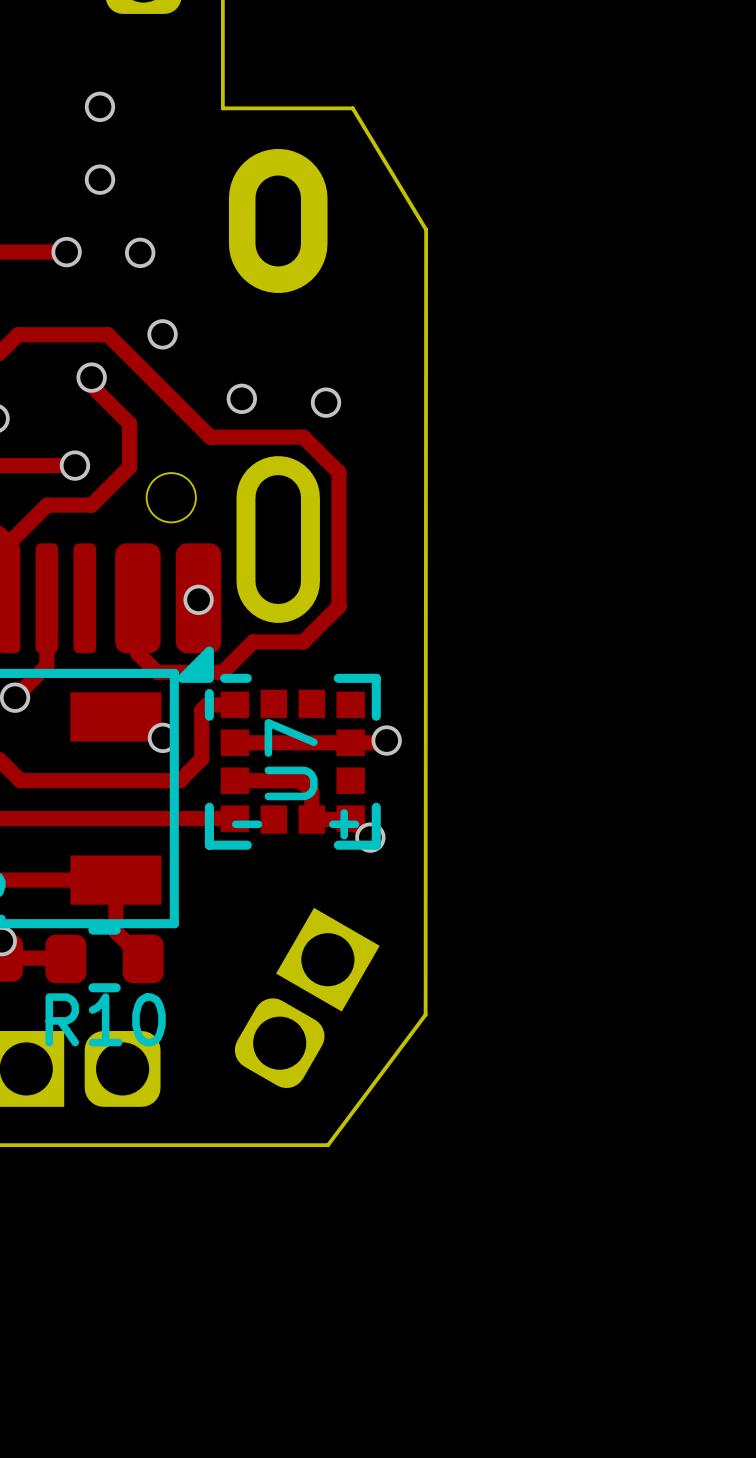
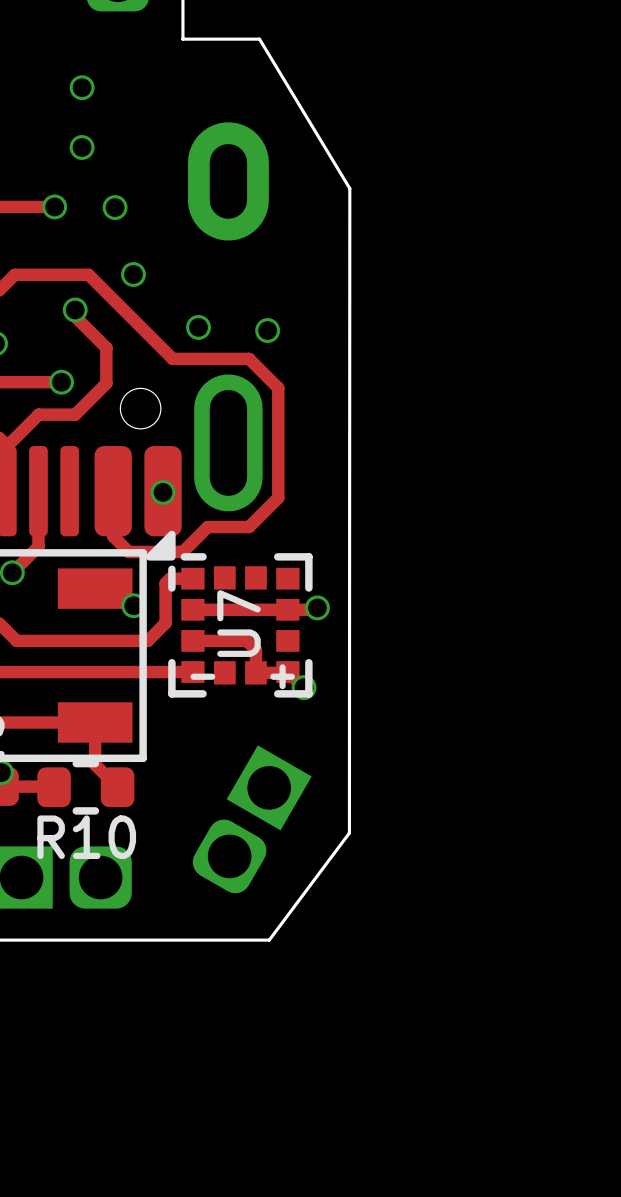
board edge: (222, 47) (222, 108) (352, 108) -> (182, 39) (259, 39) (289, 88)

